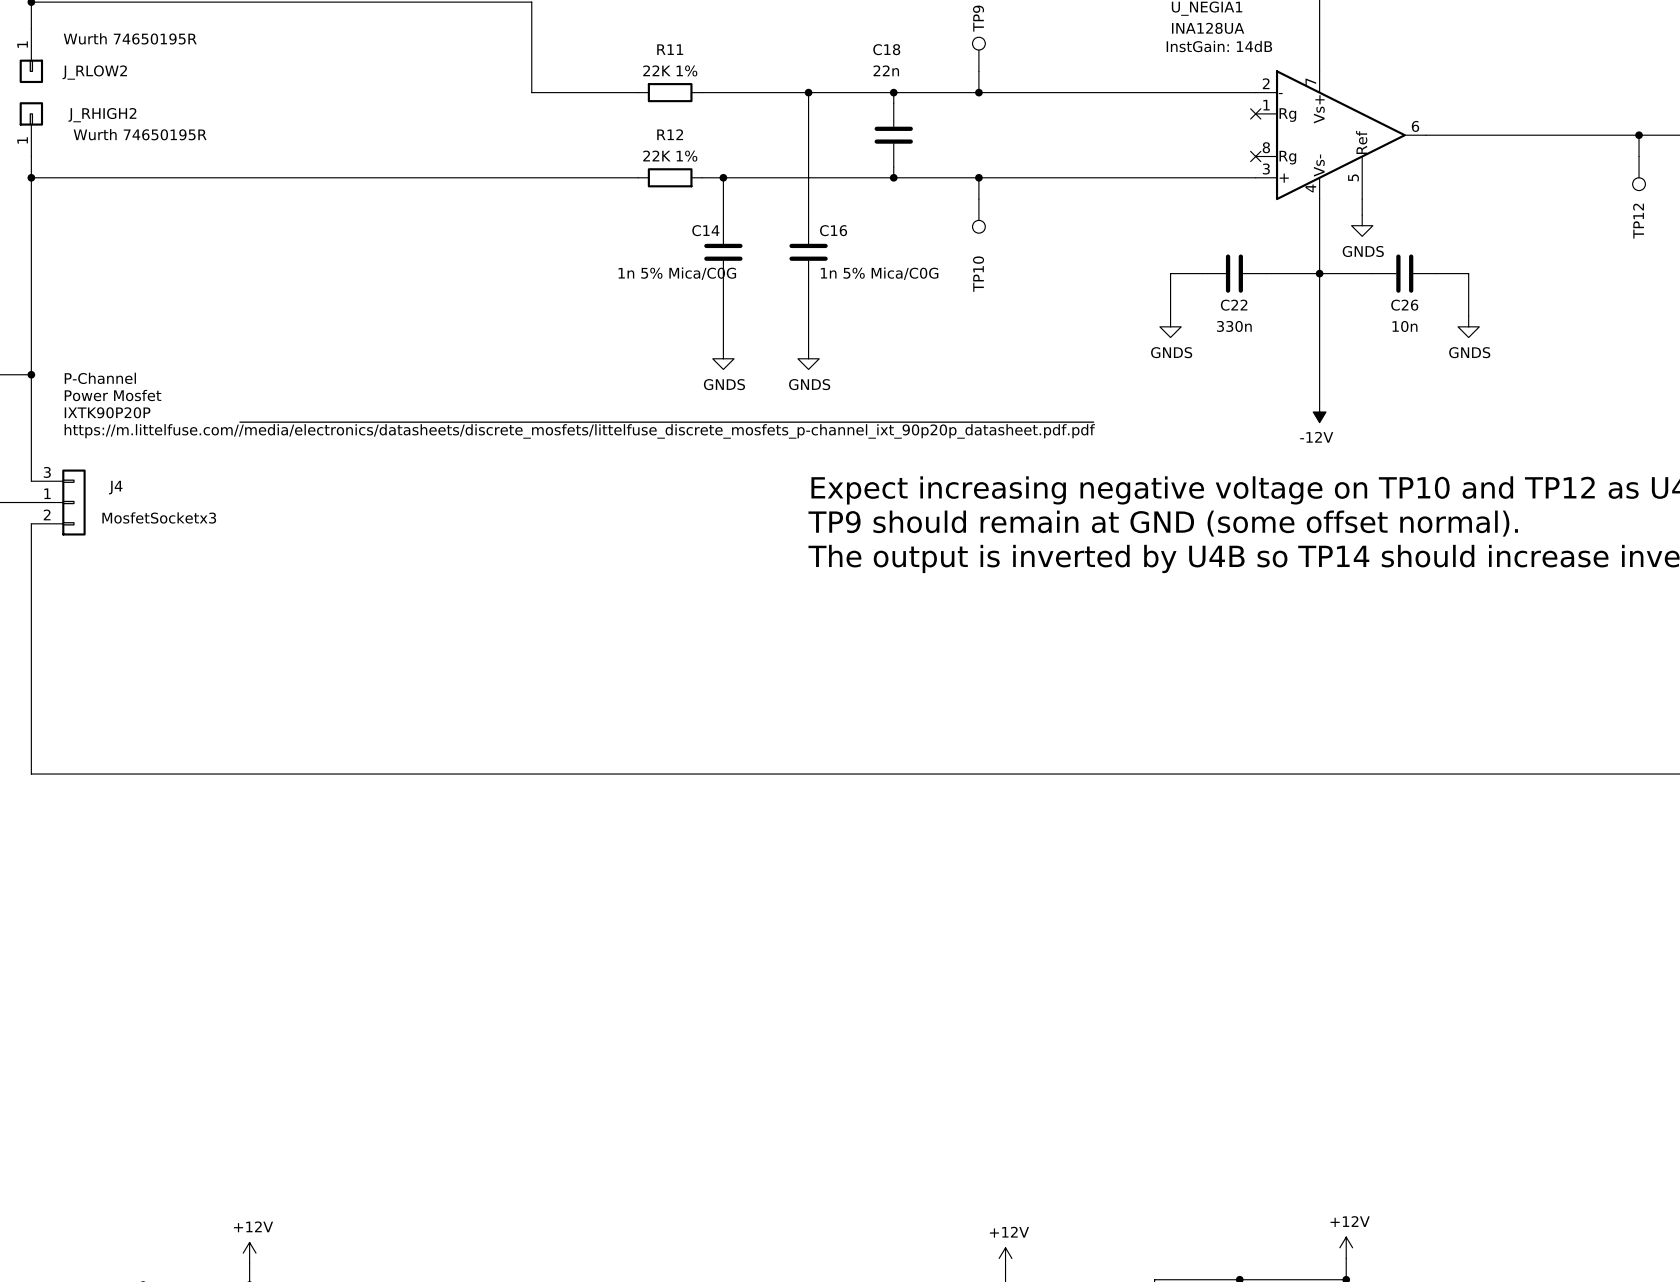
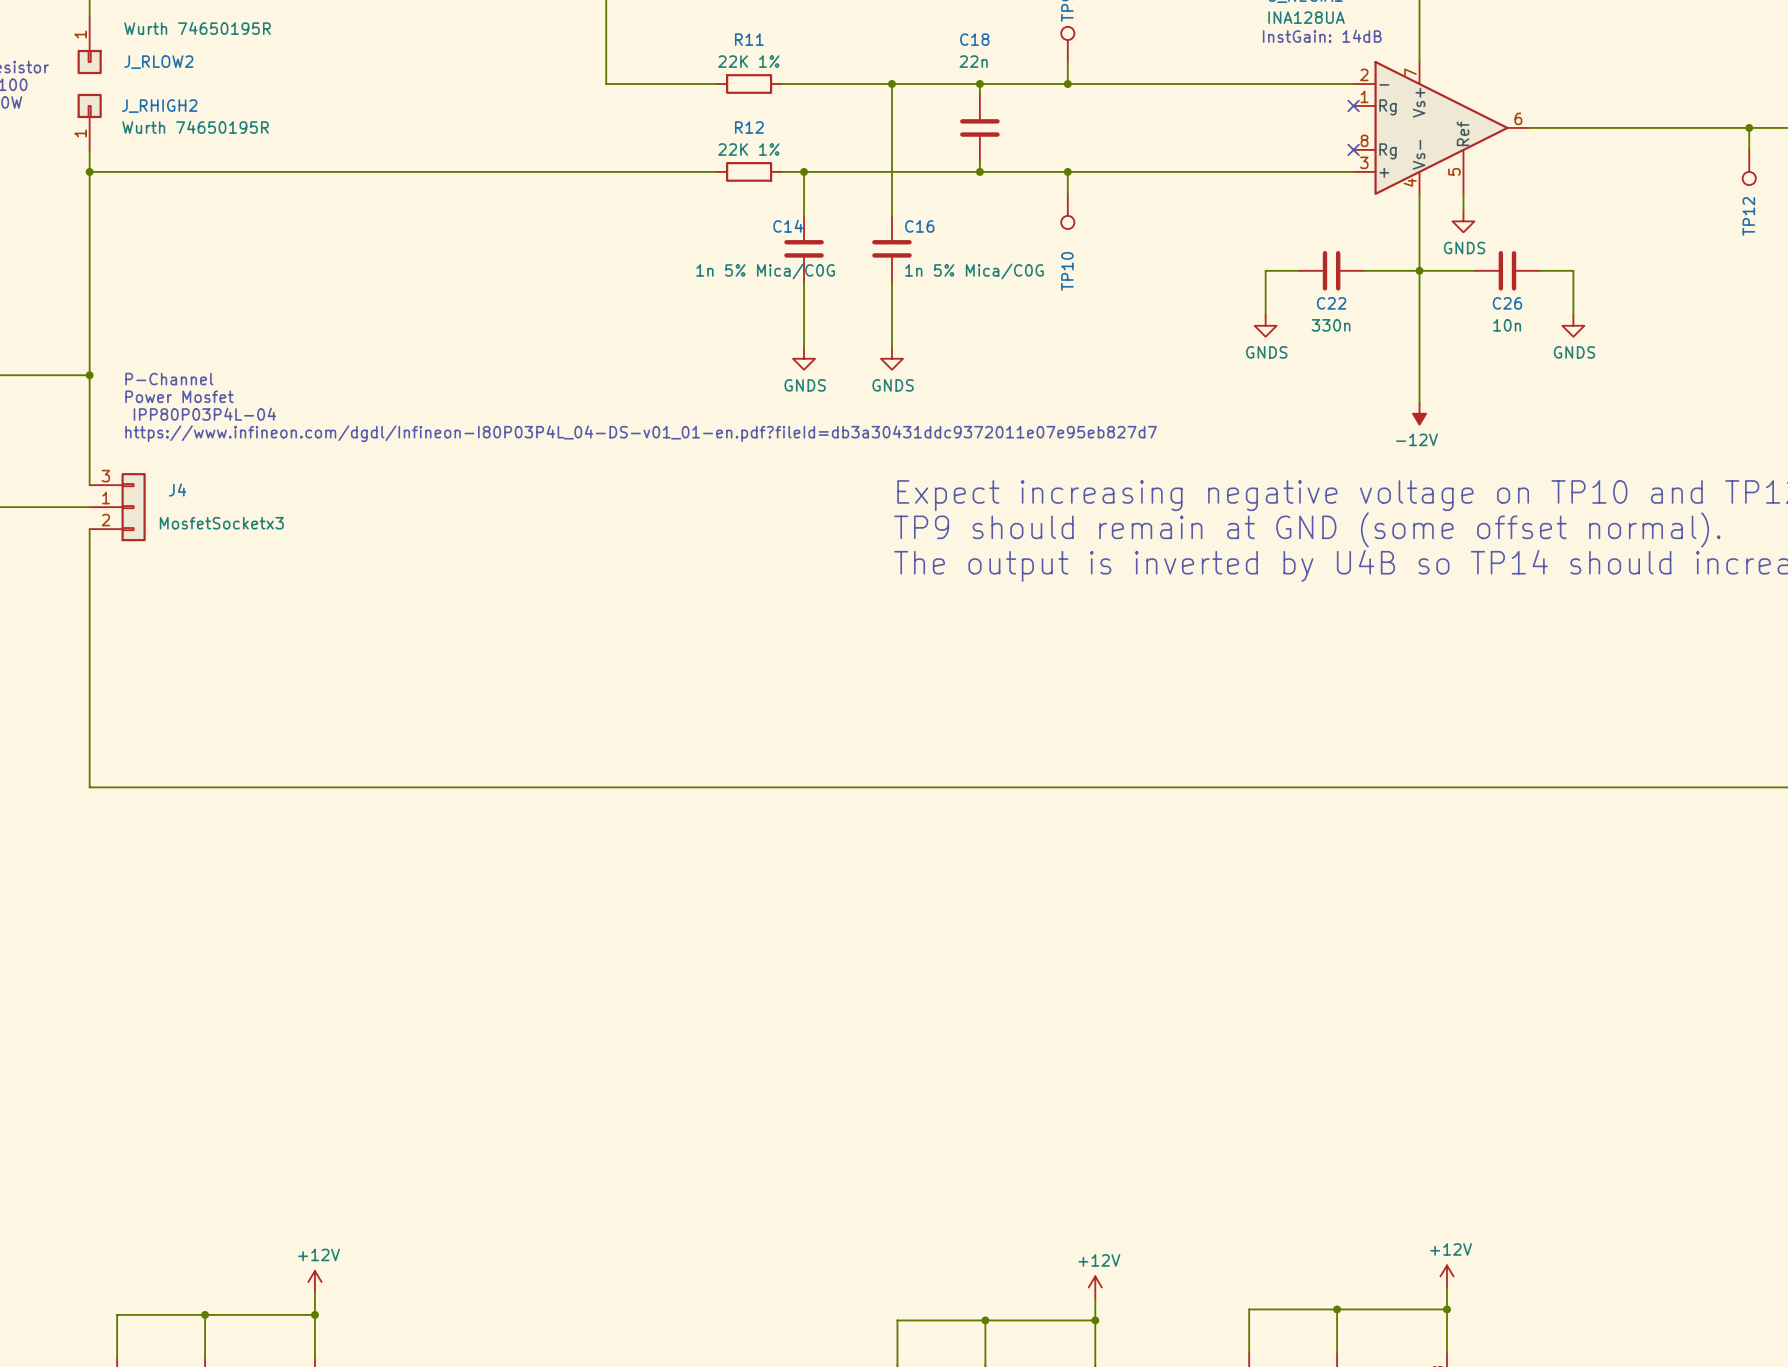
text: IXTK90P20P (107, 412) -> IPP80P03P4L-04 (204, 414)
text: https://m.littelfuse.com/~{/media/electronics/datasheets/discrete_mosfets/littelfuse_discrete_mosfets_p-channel_ixt_90p20p_datasheet.pdf.pdf} (579, 430) -> https://www.infineon.com/dgdl/Infineon-I80P03P4L_04-DS-v01_01-en.pdf?fileId=db3a30431ddc9372011e07e95eb827d7 (641, 433)

